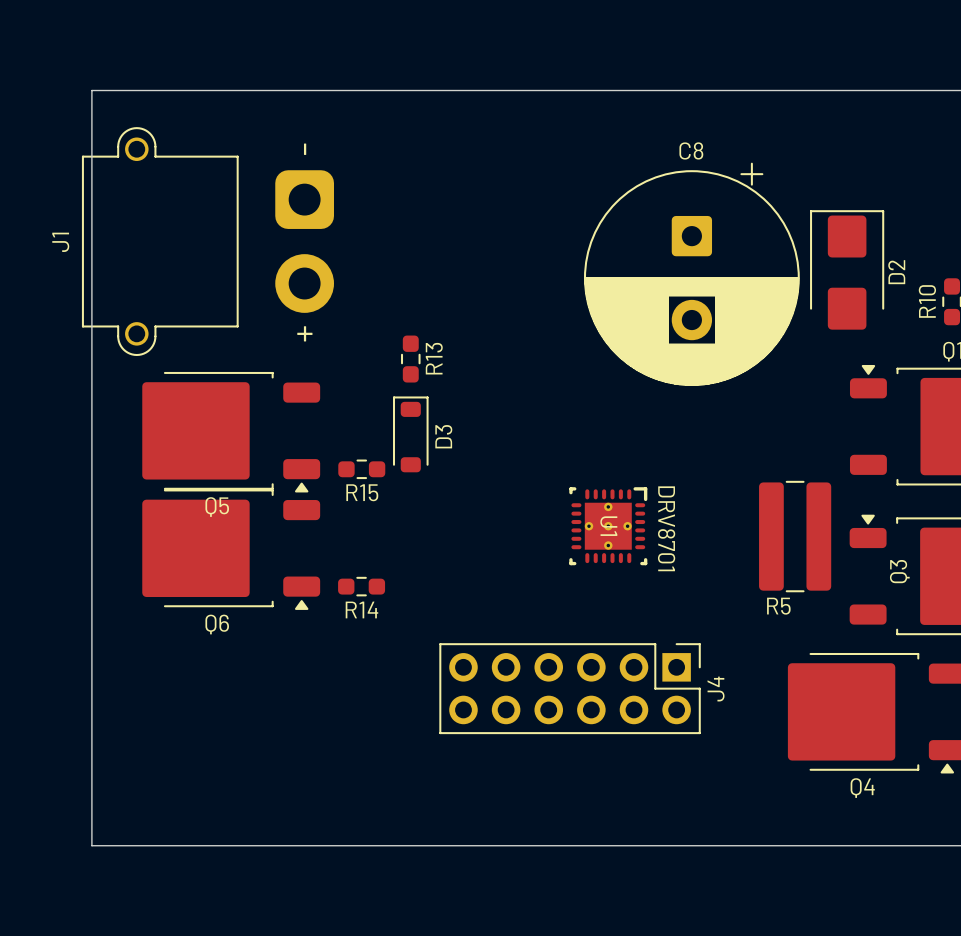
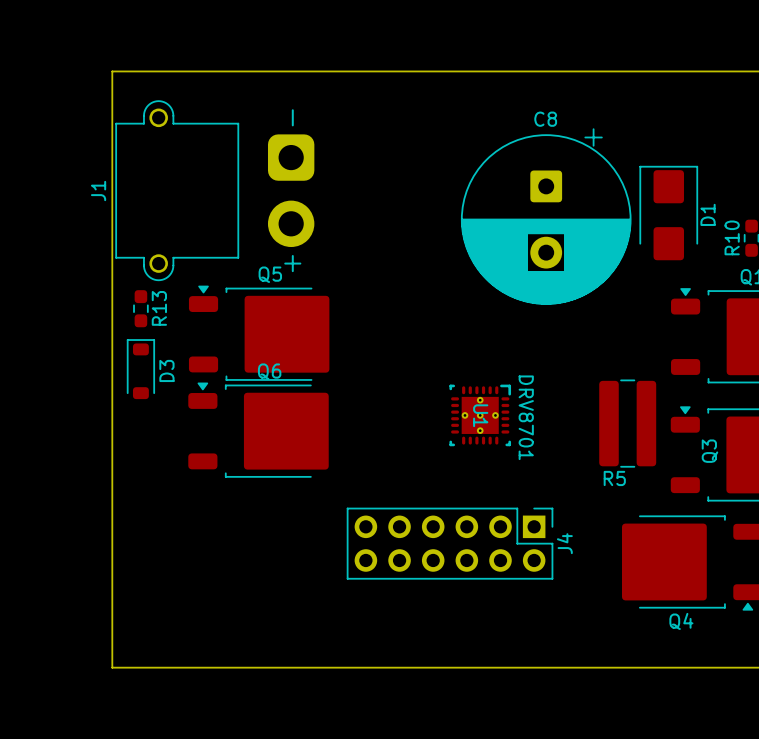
board edge: (142, 90) (91, 90) (91, 845) (142, 845) -> (112, 71) (112, 667)
J1 position: (207, 241) -> (214, 190)
D2 name: D2 (896, 272) -> D1 (708, 214)
R13 position: (410, 359) -> (140, 308)
Q5 rotation: 0° (231, 432) -> 180° (259, 333)
D3 position: (410, 434) -> (140, 369)
R15: (361, 469) -> none
Q6 rotation: 0° (231, 549) -> 180° (258, 430)
R14: (361, 586) -> none

